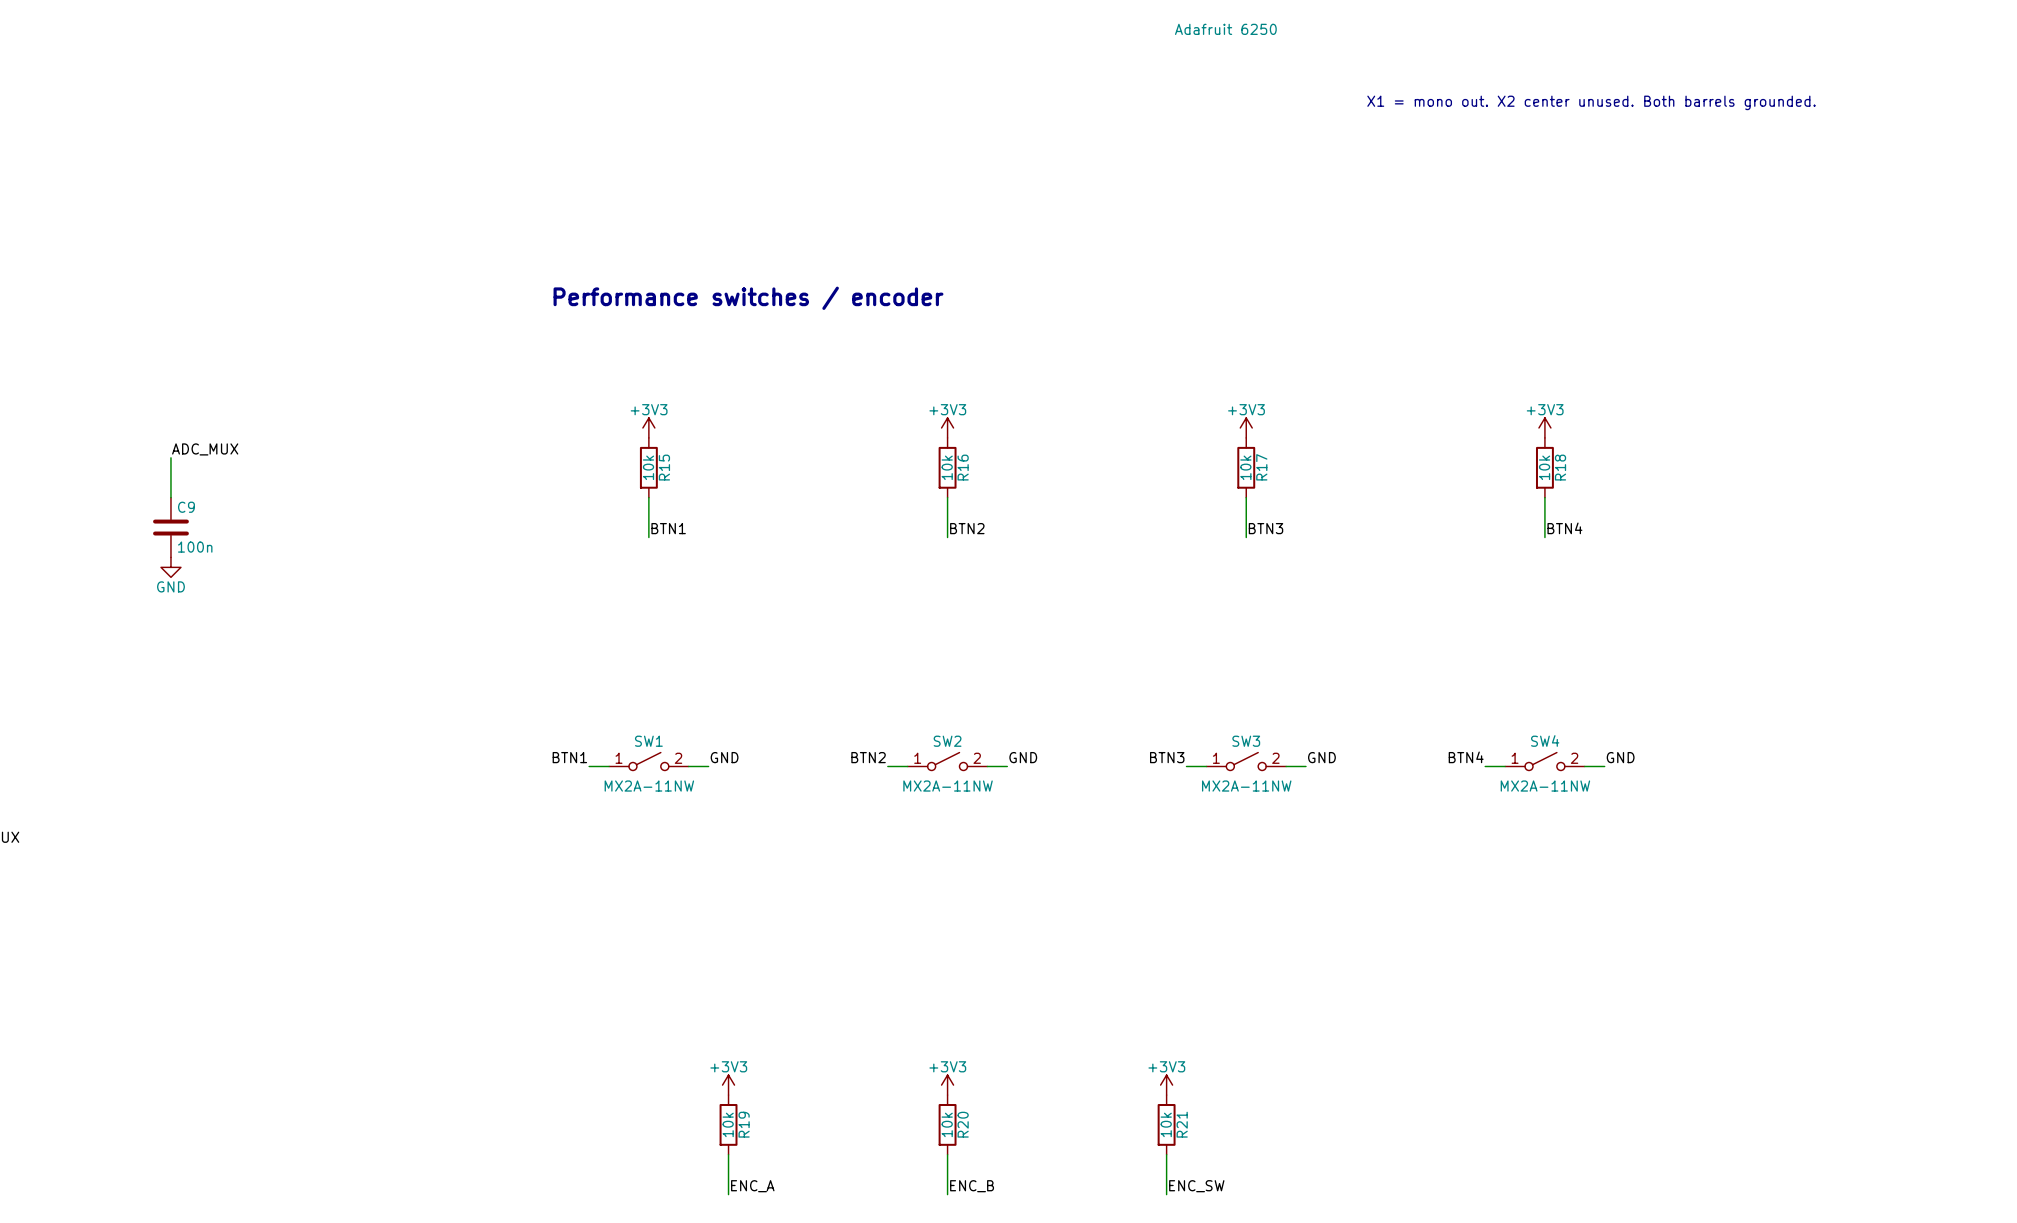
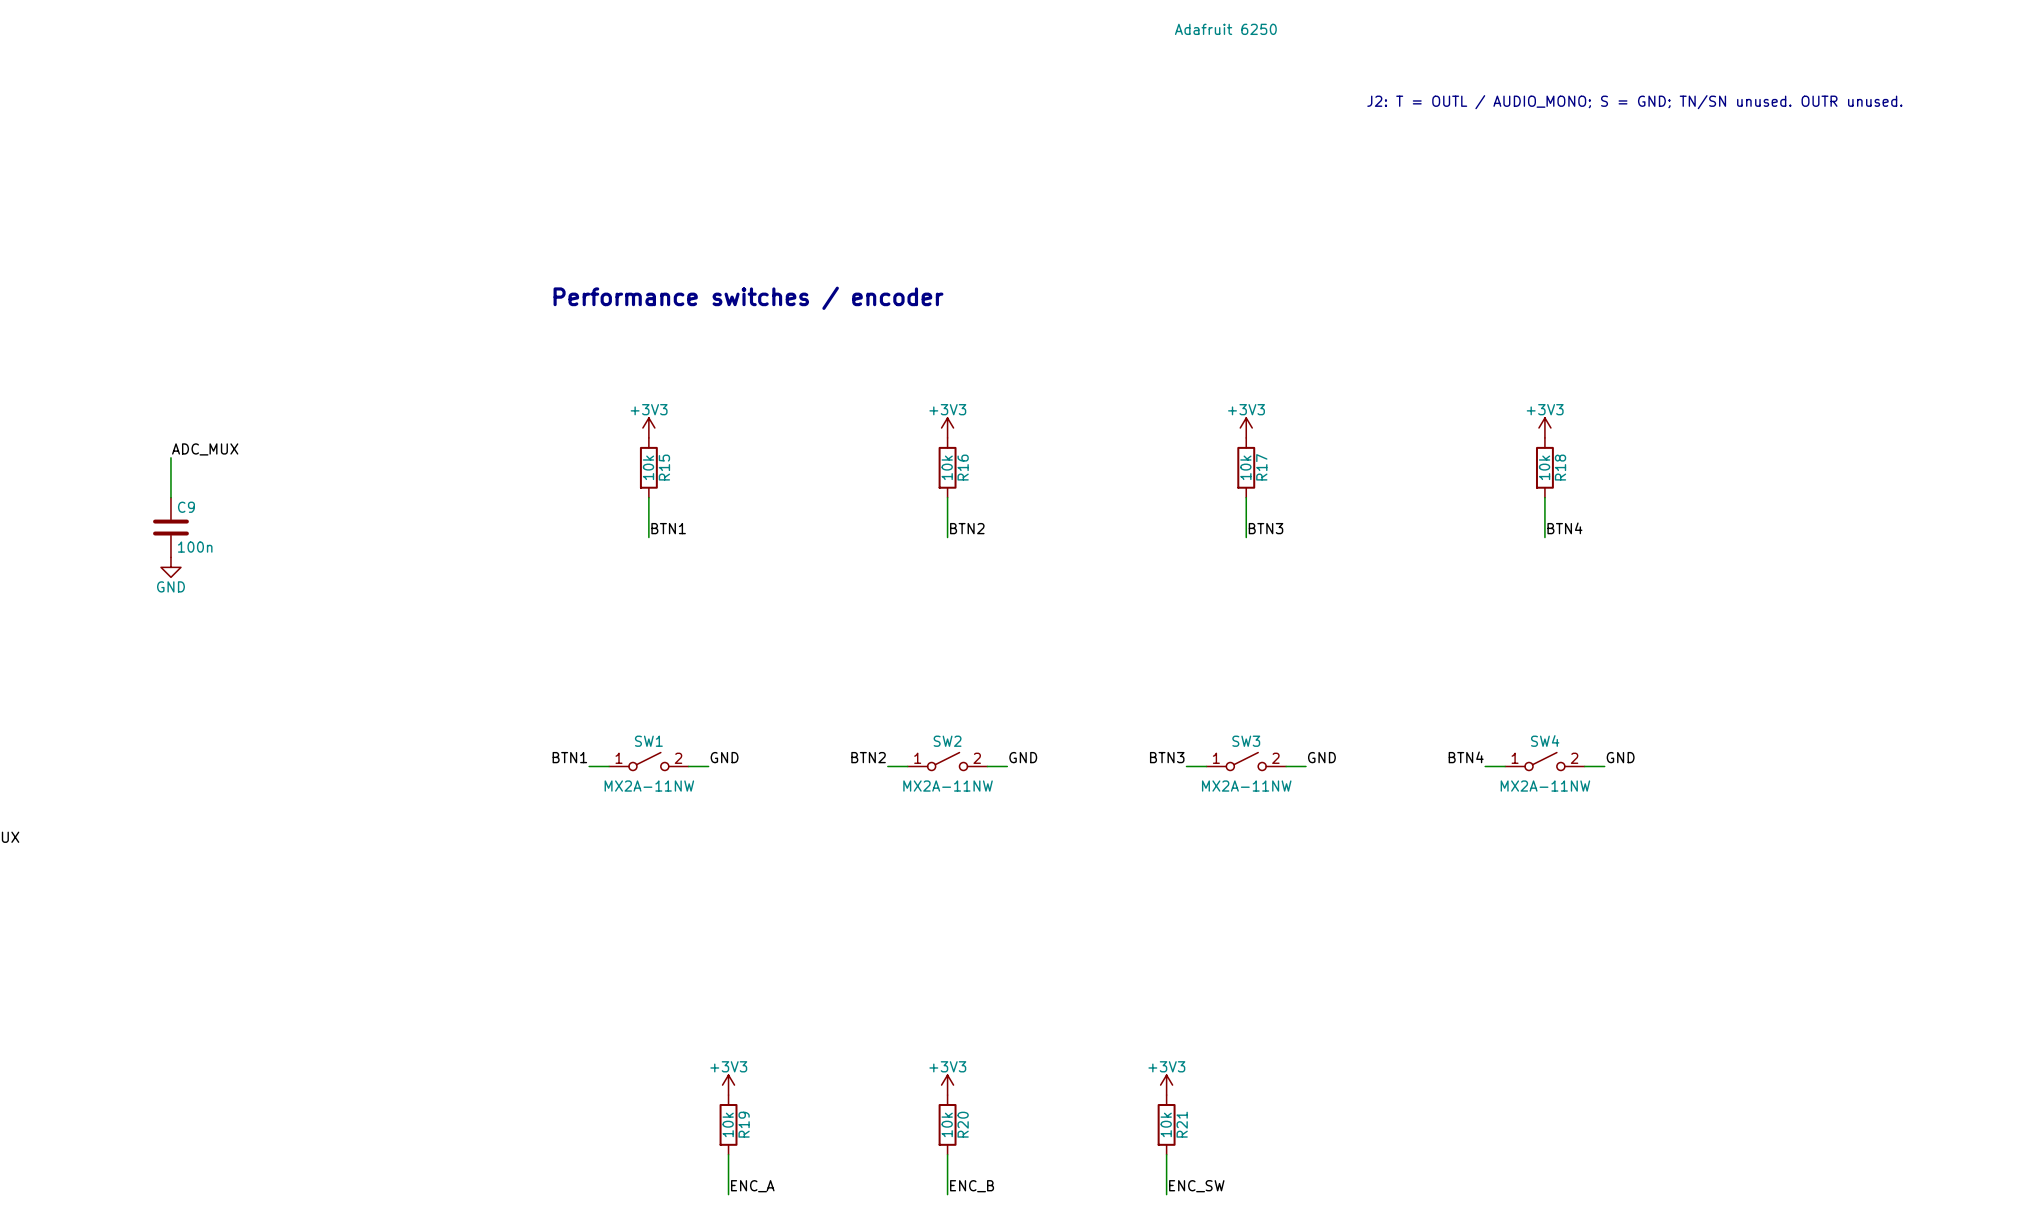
text: X1 = mono out. X2 center unused. Both barrels grounded. (1591, 102) -> J2: T = OUTL / AUDIO_MONO; S = GND; TN/SN unused. OUTR unused. (1634, 102)

